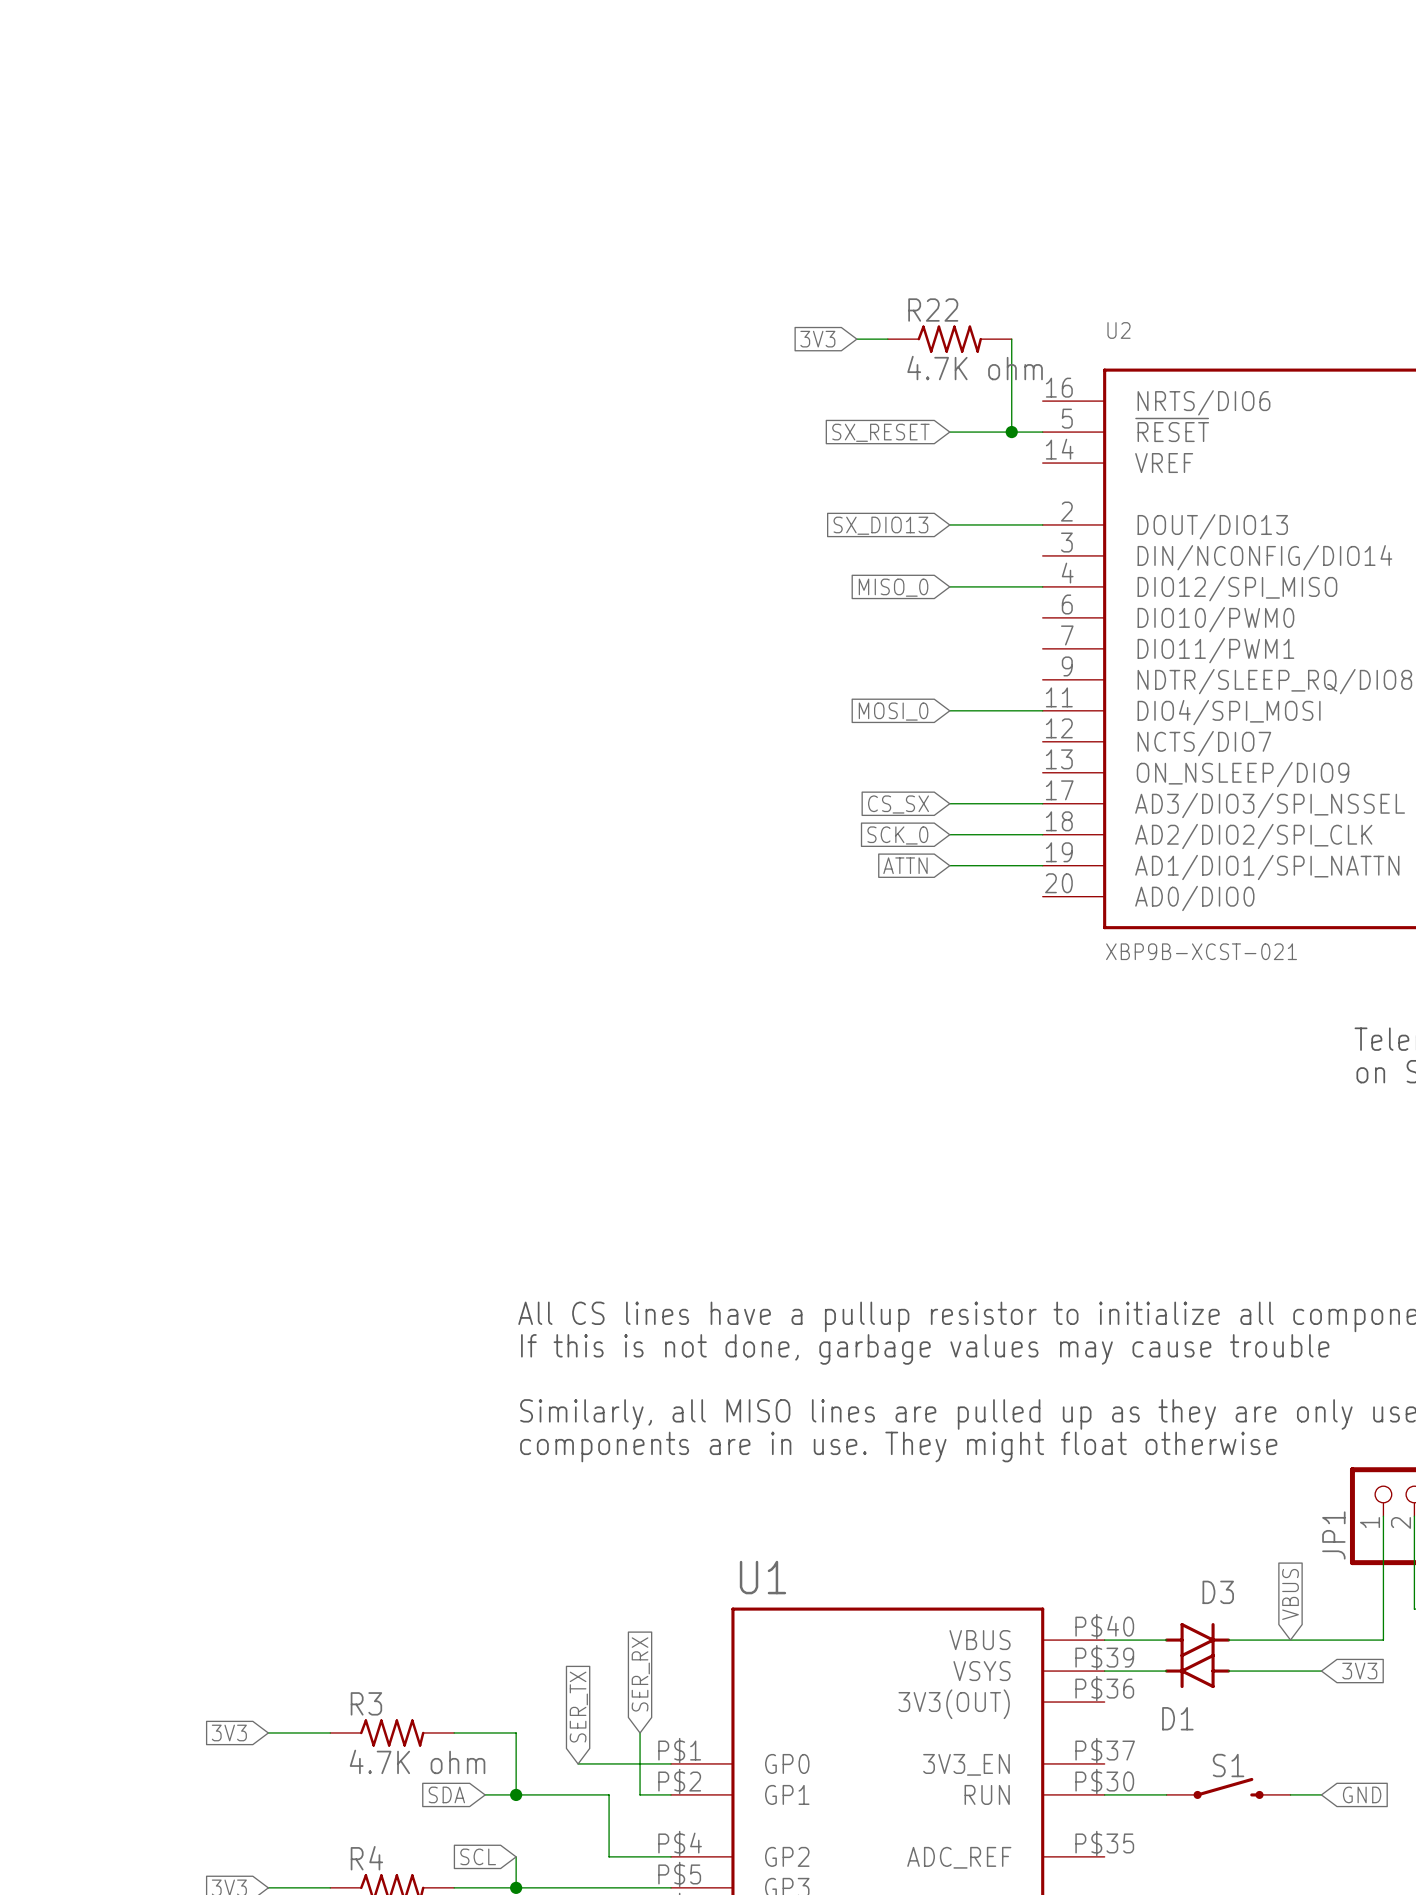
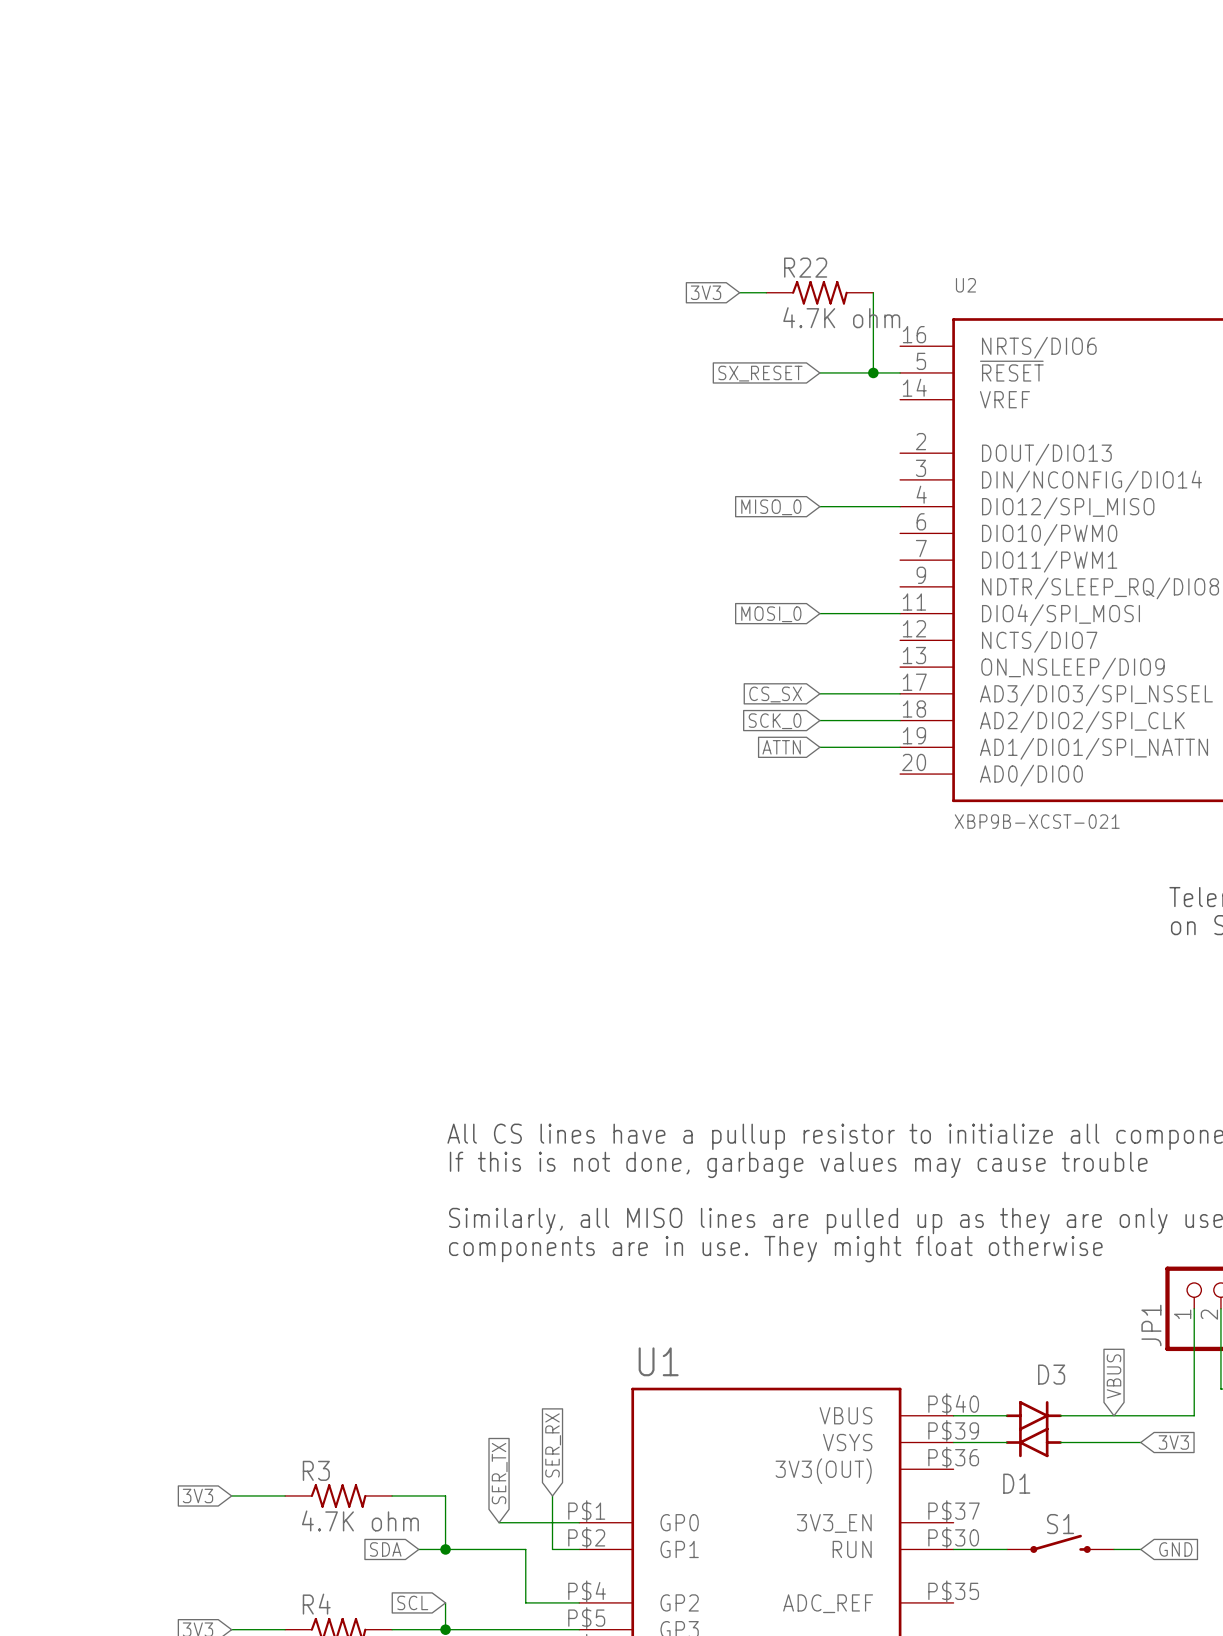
wire: (949, 524) (1042, 524) -> none
global label: SX_DIO13 (880, 525) -> none

